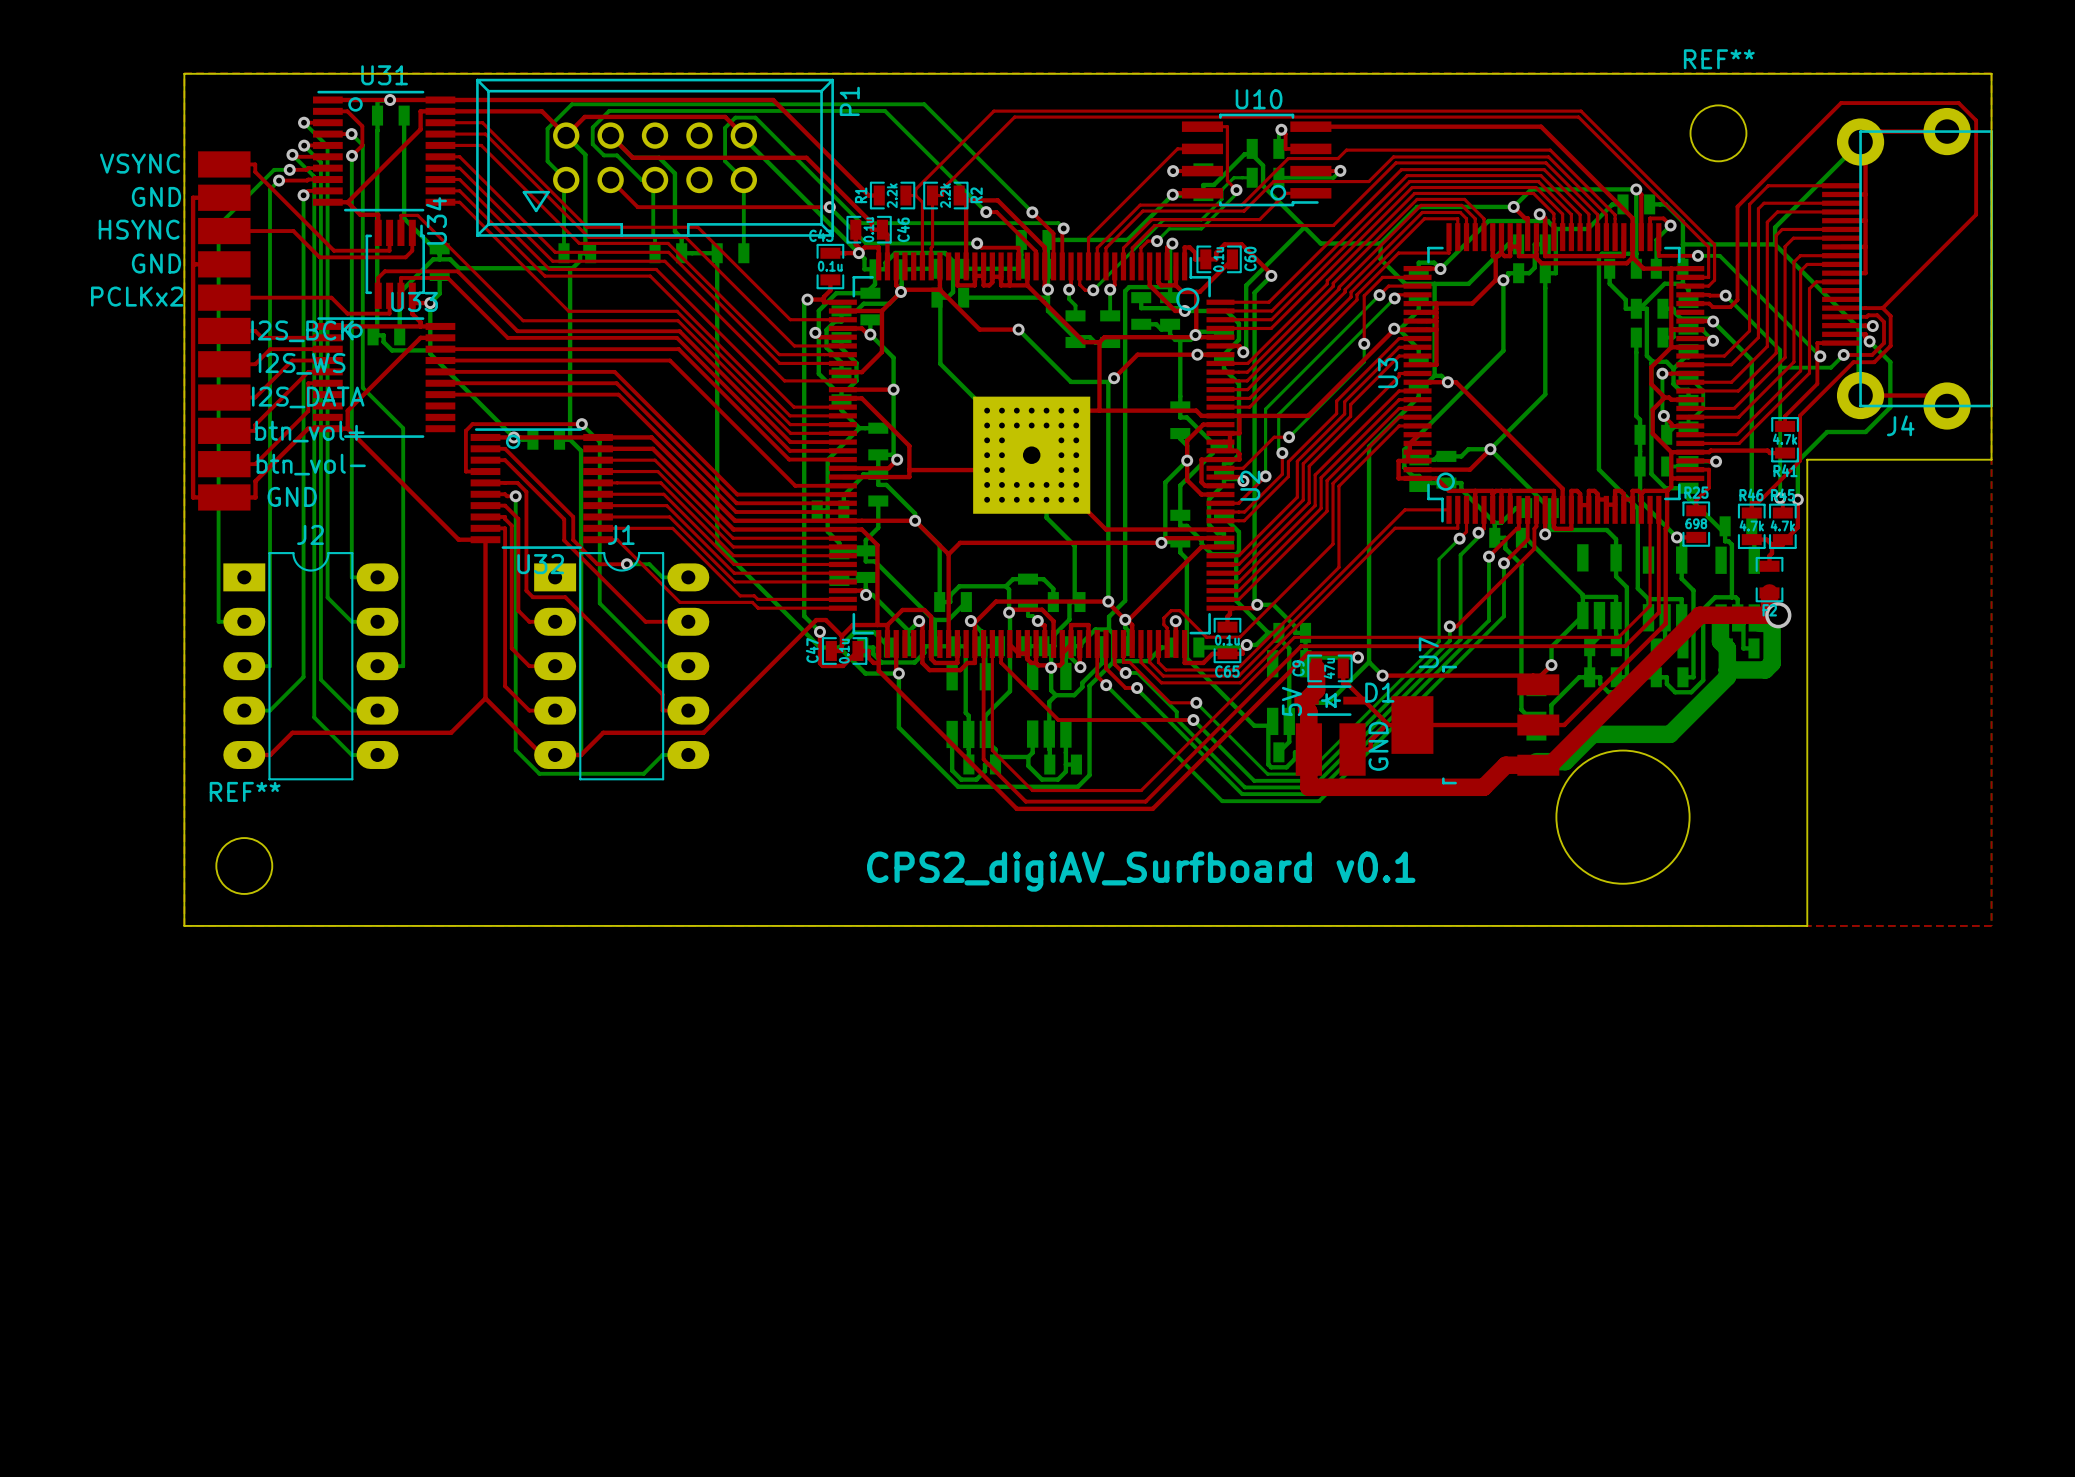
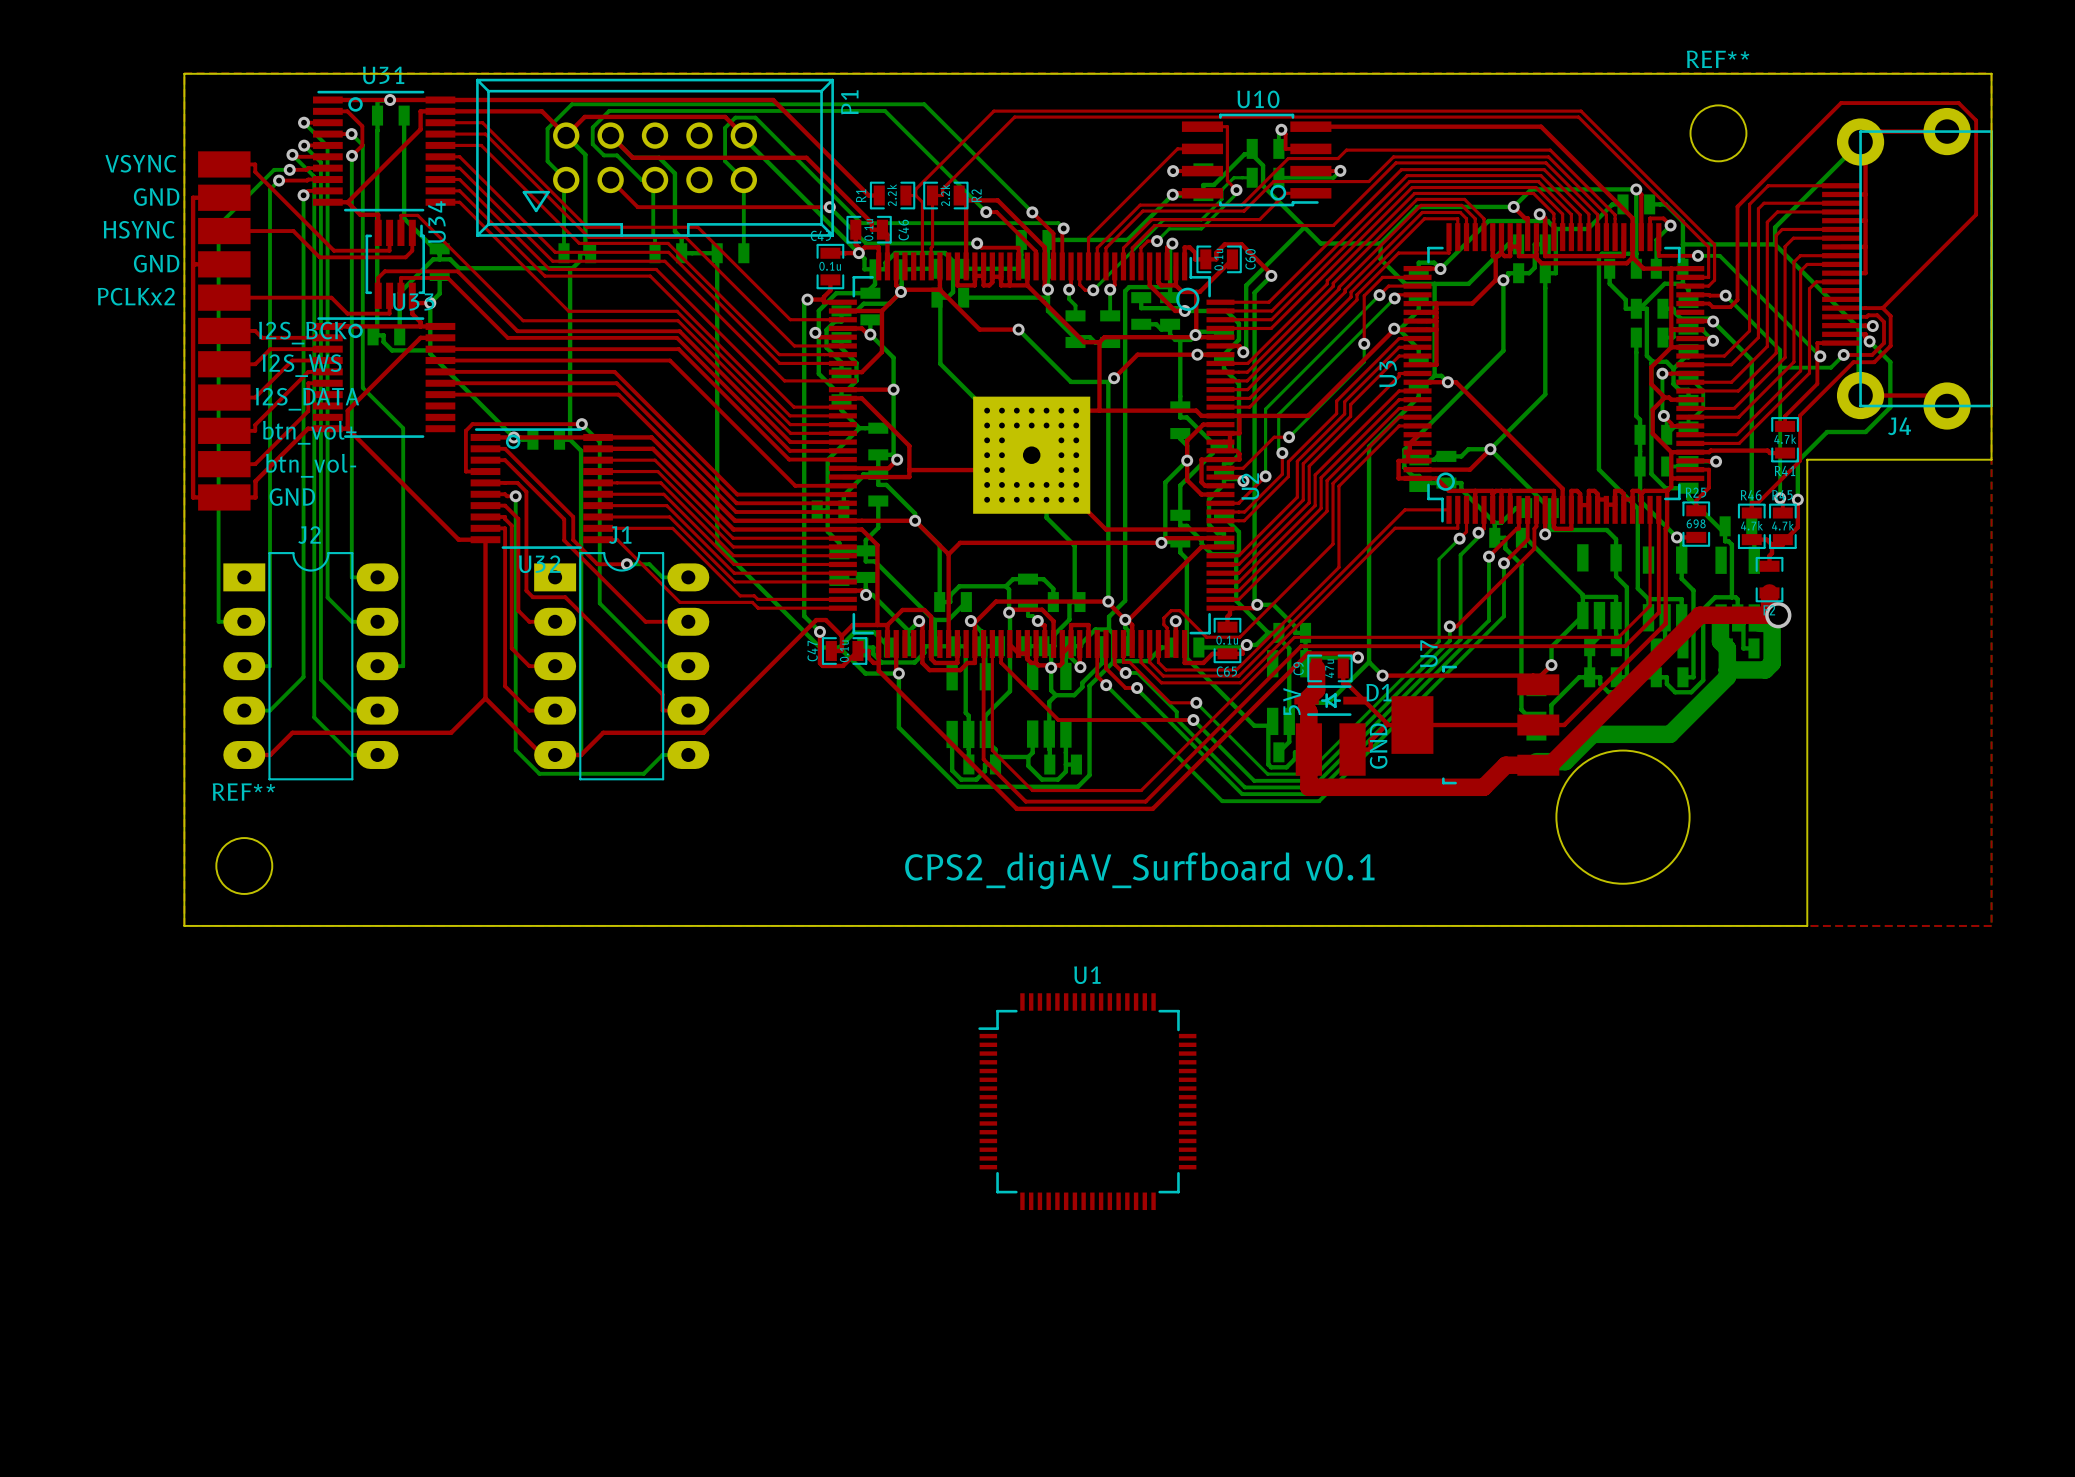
U1: none -> (1087, 1101)

